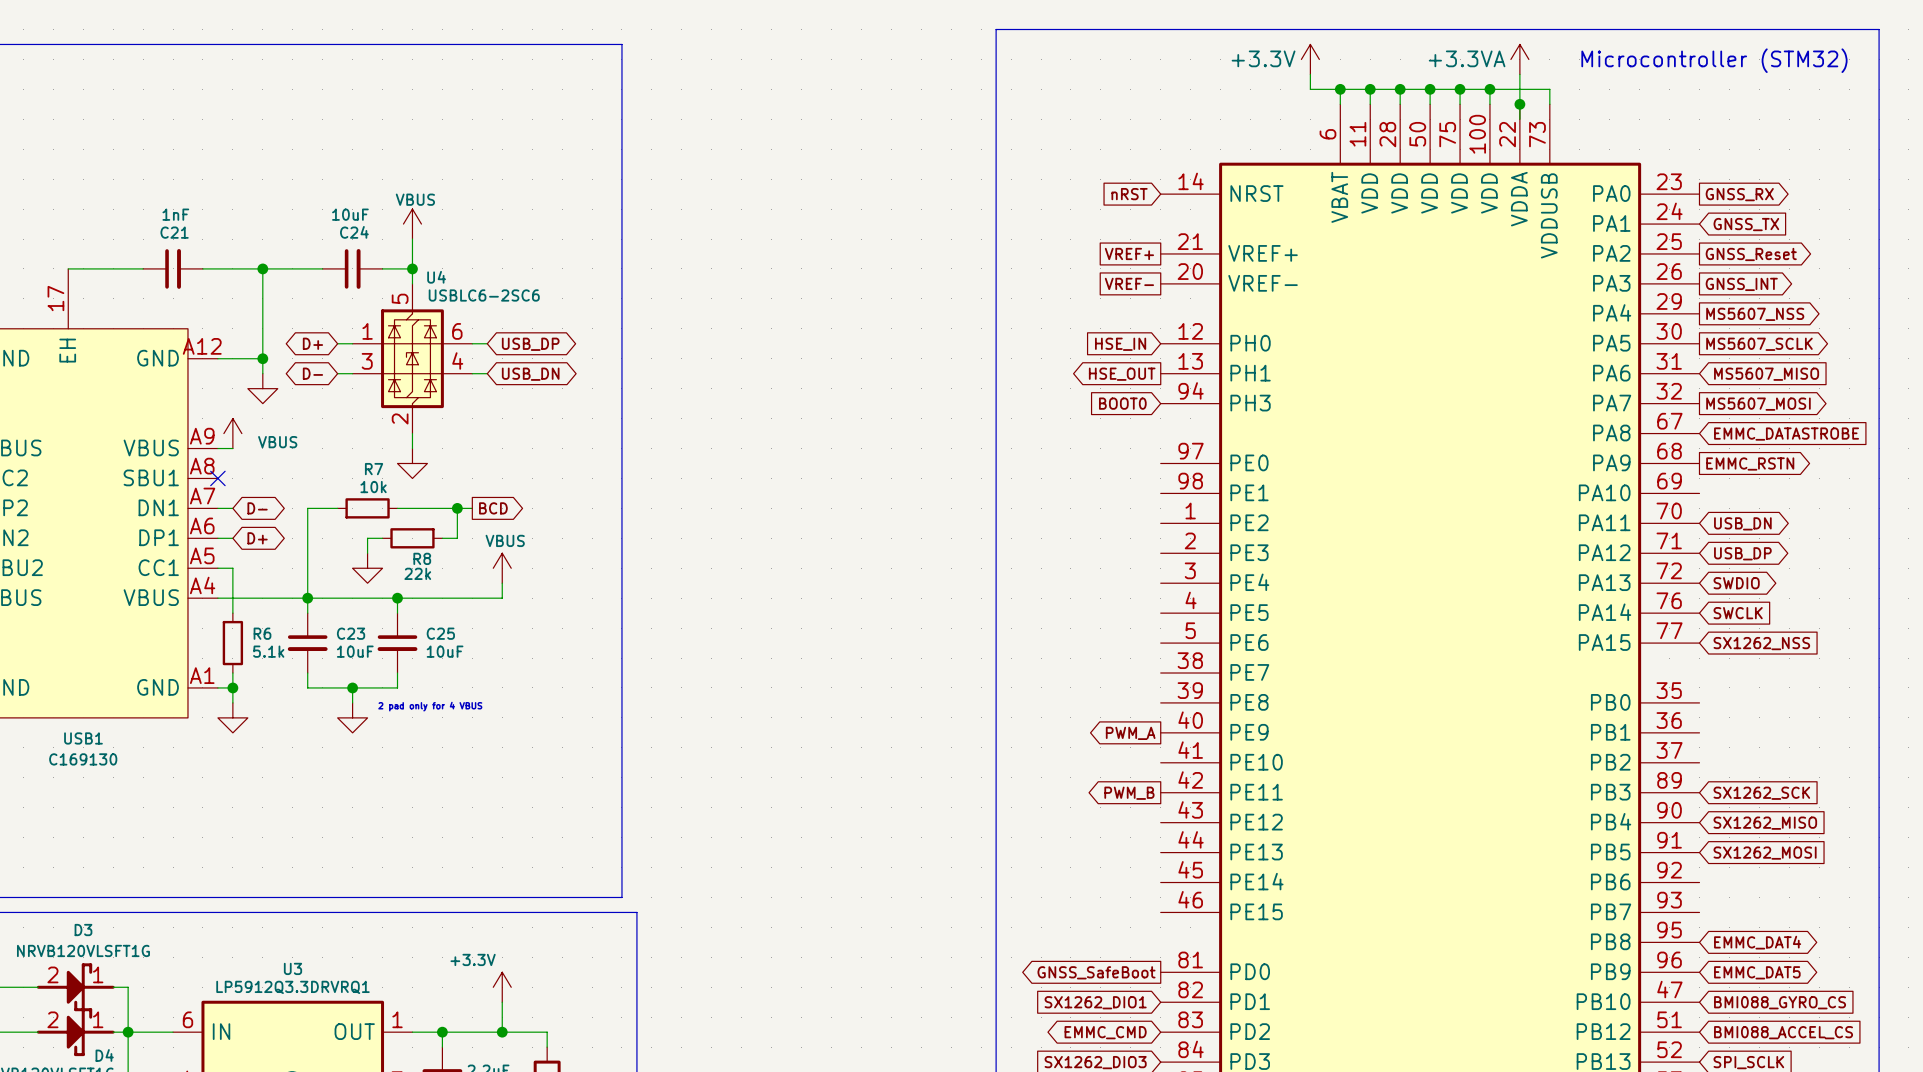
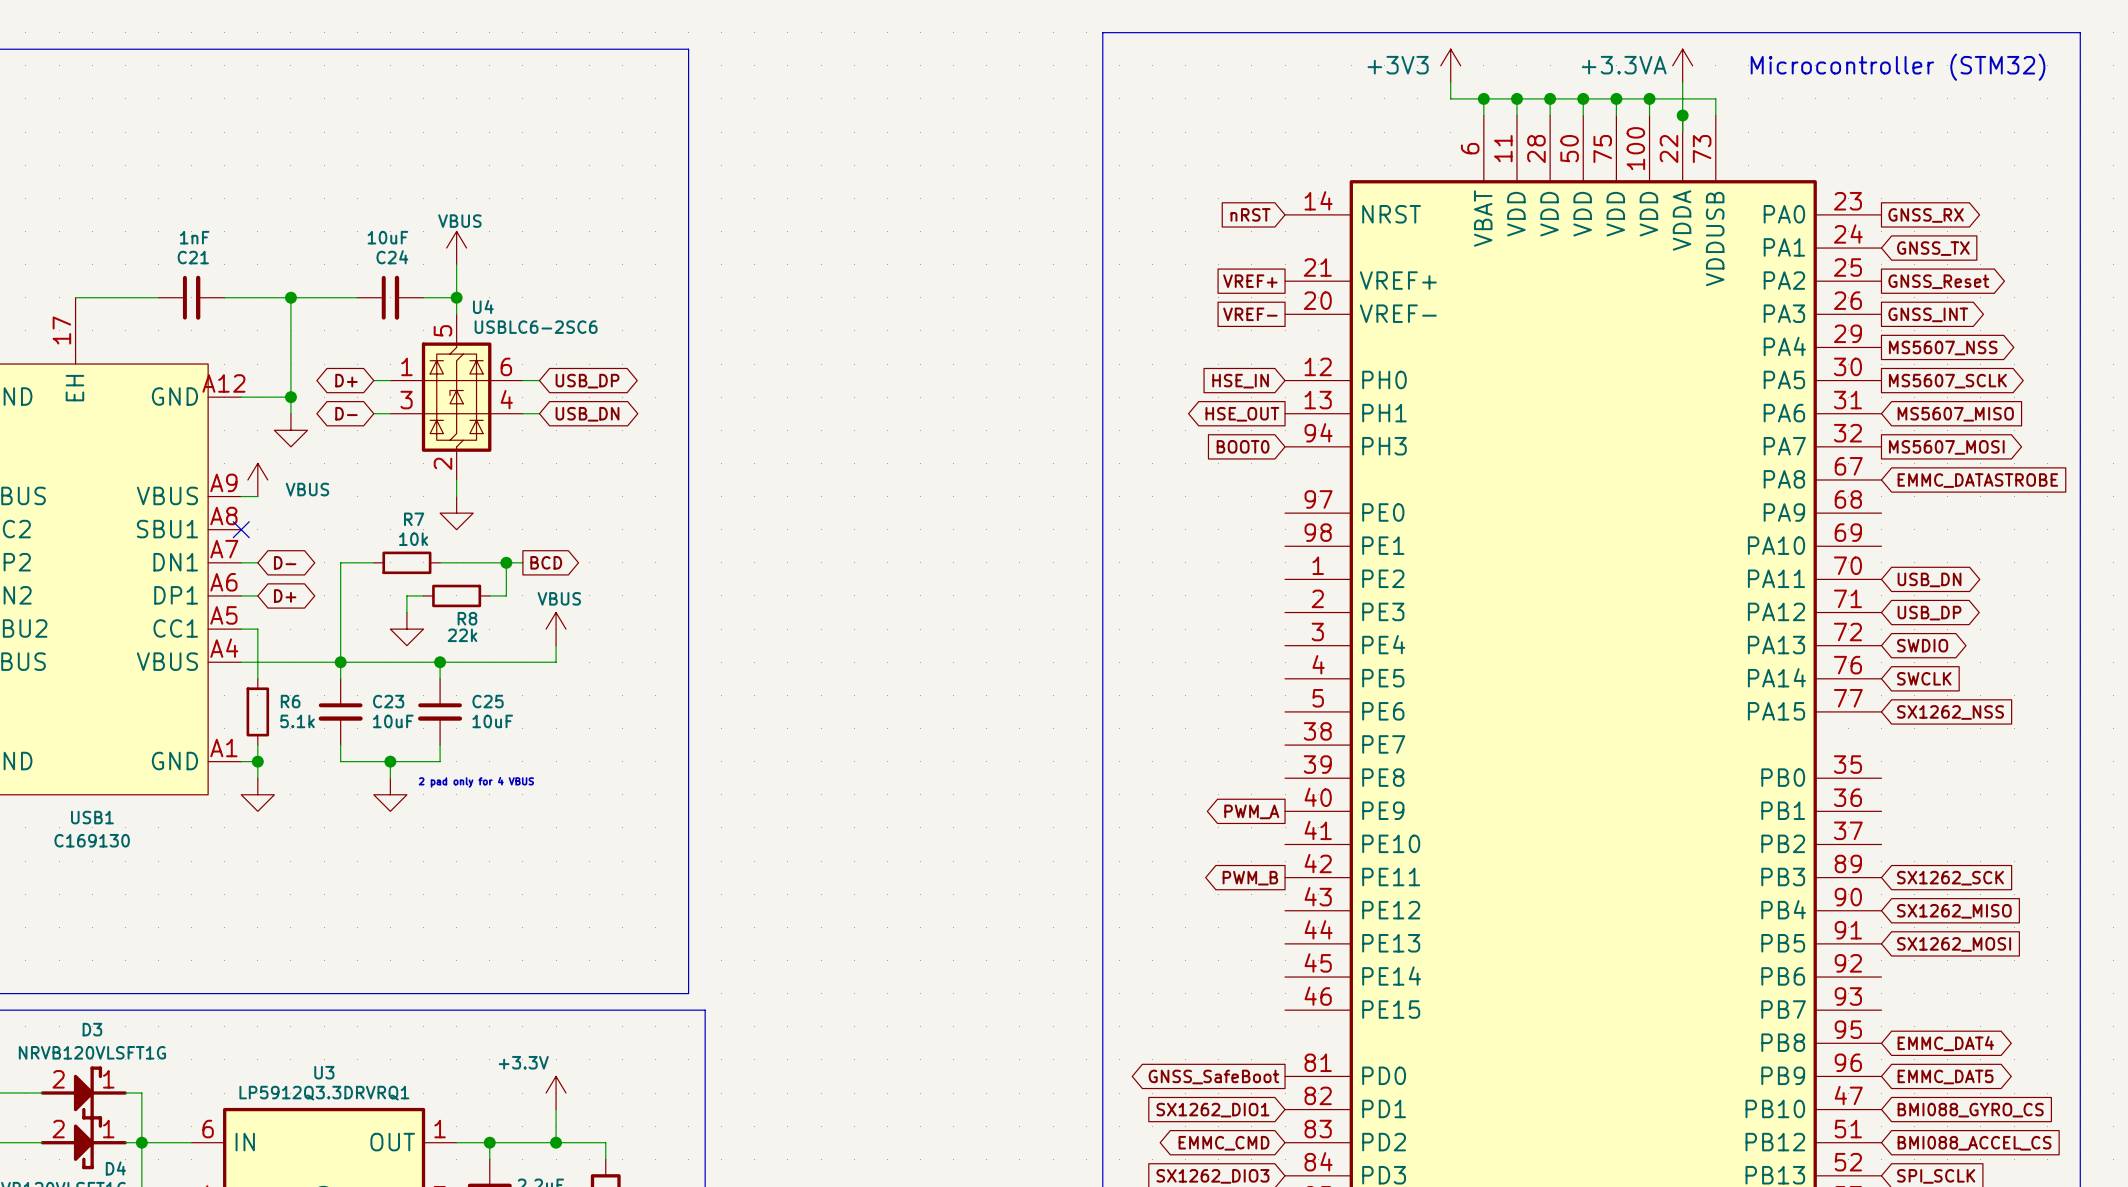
power symbol: +3.3V (1310, 59) -> +3V3 (1450, 65)
global label: EMMC_RSTN (1750, 463) -> none

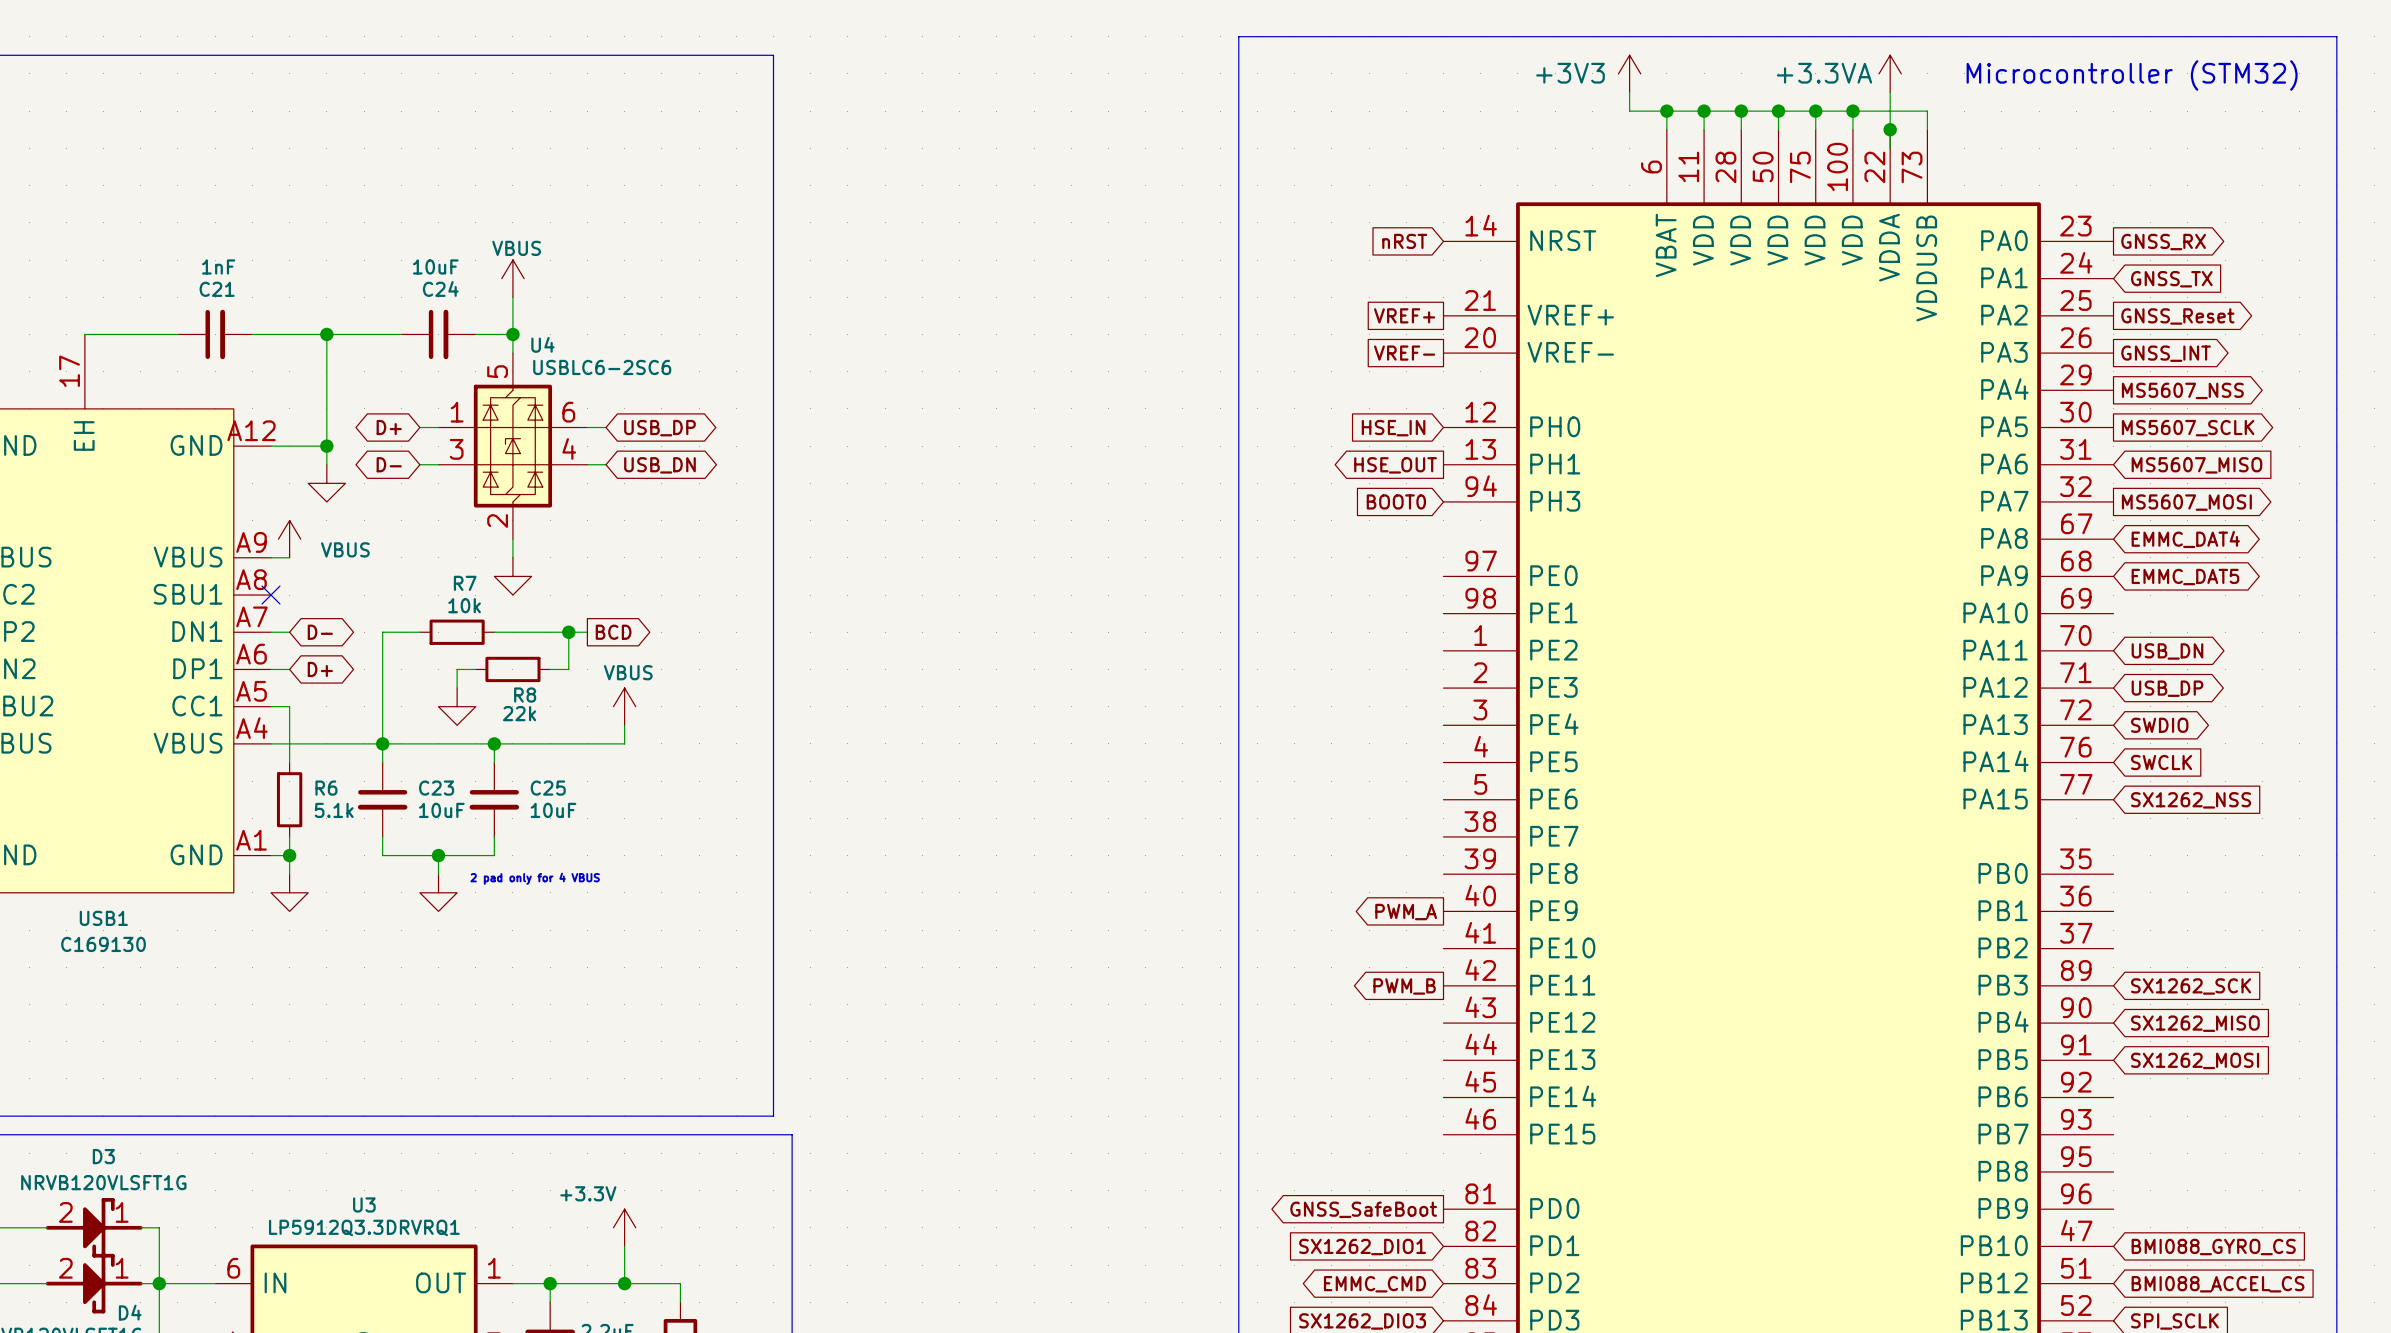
global label shape: input (1977, 480) -> bidirectional (2185, 539)
global label: EMMC_DATASTROBE (1977, 480) -> EMMC_DAT4 (2185, 539)
global label: none -> EMMC_DAT5 (2185, 577)
global label: EMMC_DAT4 (1945, 1043) -> none
global label: EMMC_DAT5 (1945, 1076) -> none

